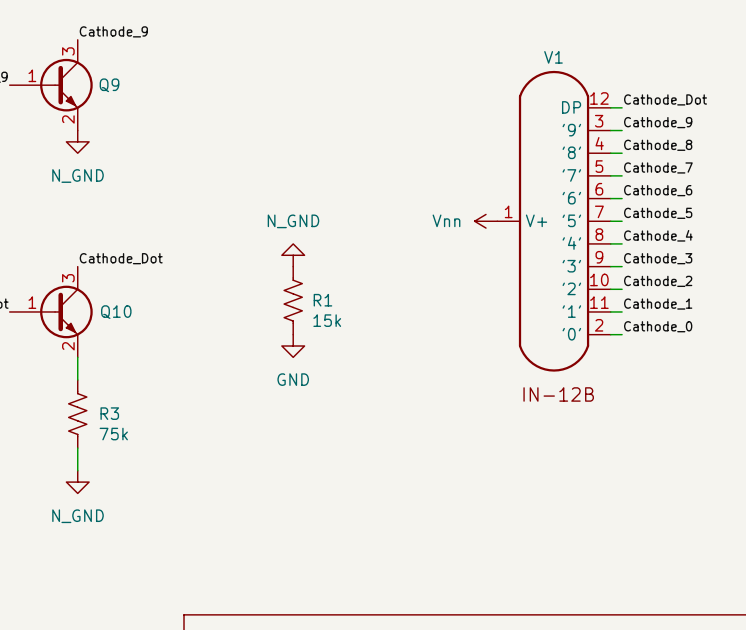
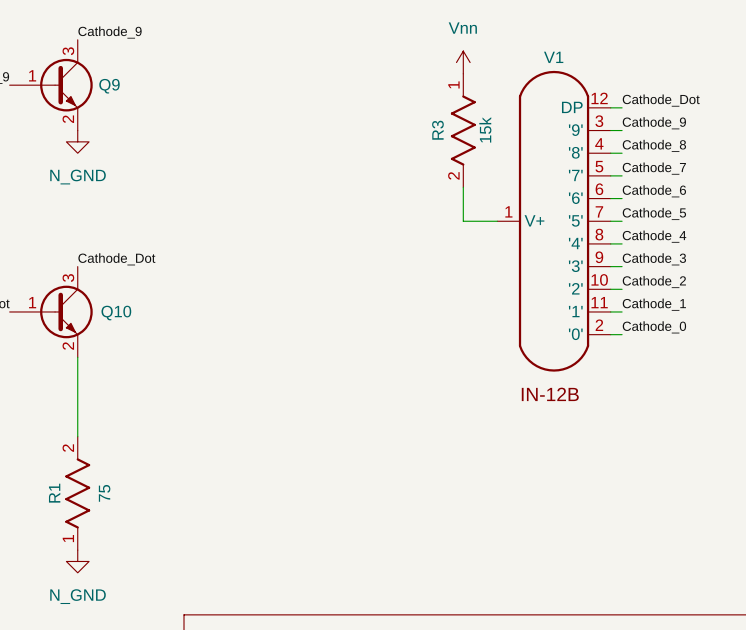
wire: none -> (463, 187) (463, 221) (497, 221)
power symbol rotation: 0° (485, 221) -> 90° clockwise (463, 62)
power symbol position: Vnn (485, 221) -> Vnn (463, 62)
power symbol: N_GND (293, 255) -> none
R1 symbol: [284, 266, 303, 335] -> [65, 436, 91, 551]
R1 name position: R1 (322, 300) -> R1 (54, 493)
R1 value: 15k (327, 320) -> 75 (104, 493)
power symbol: GND (293, 346) -> none
R3 symbol: [68, 380, 87, 449] -> [450, 73, 476, 188]
wire: none -> (77, 380) (77, 436)
R3 name position: R3 (109, 413) -> R3 (437, 130)
R3 value: 75k (113, 434) -> 15k (485, 129)
power symbol position: N_GND (77, 482) -> N_GND (77, 561)

